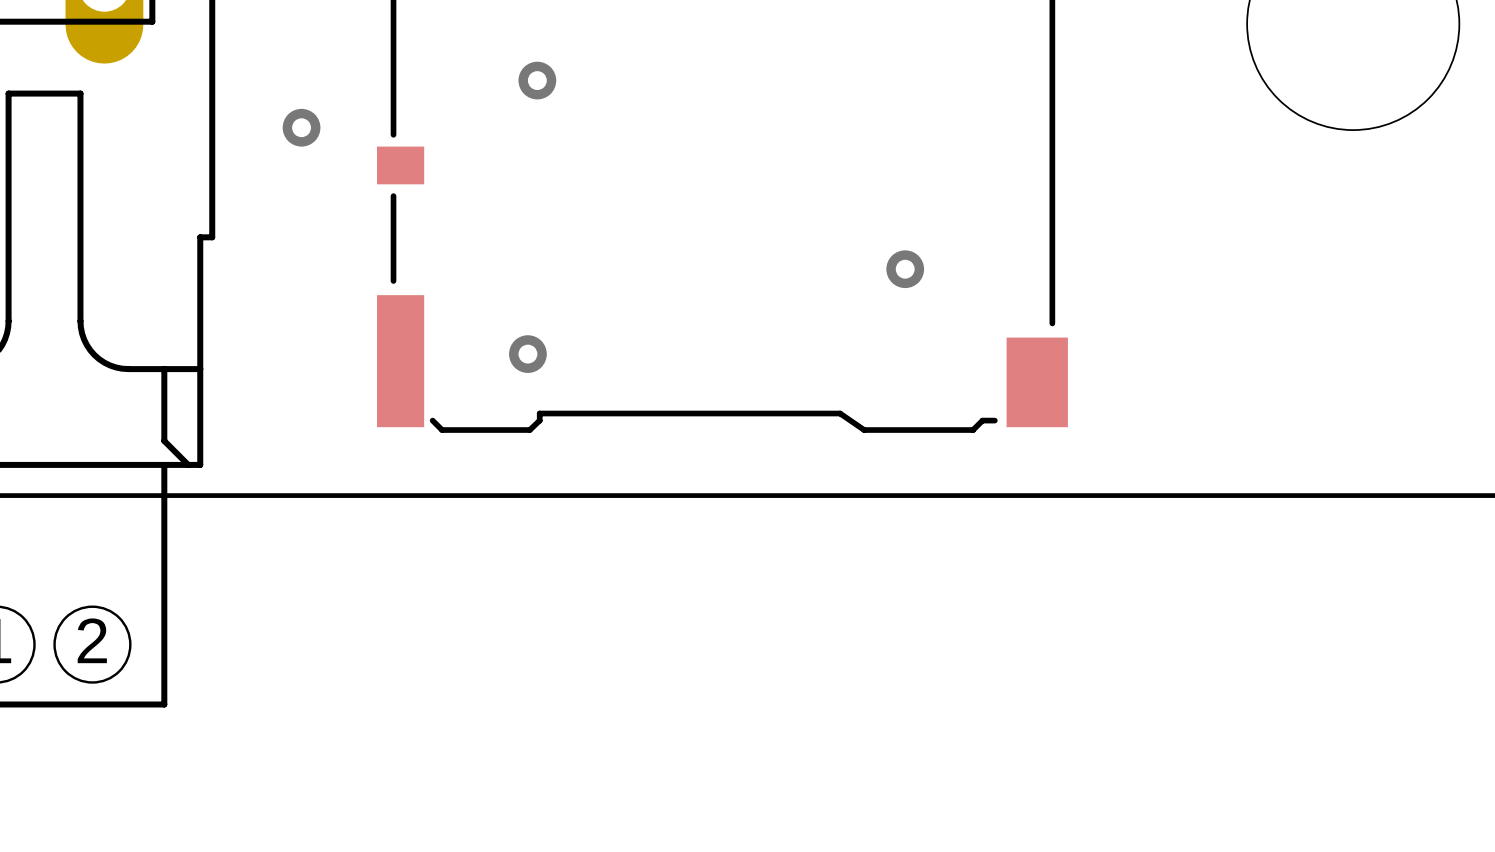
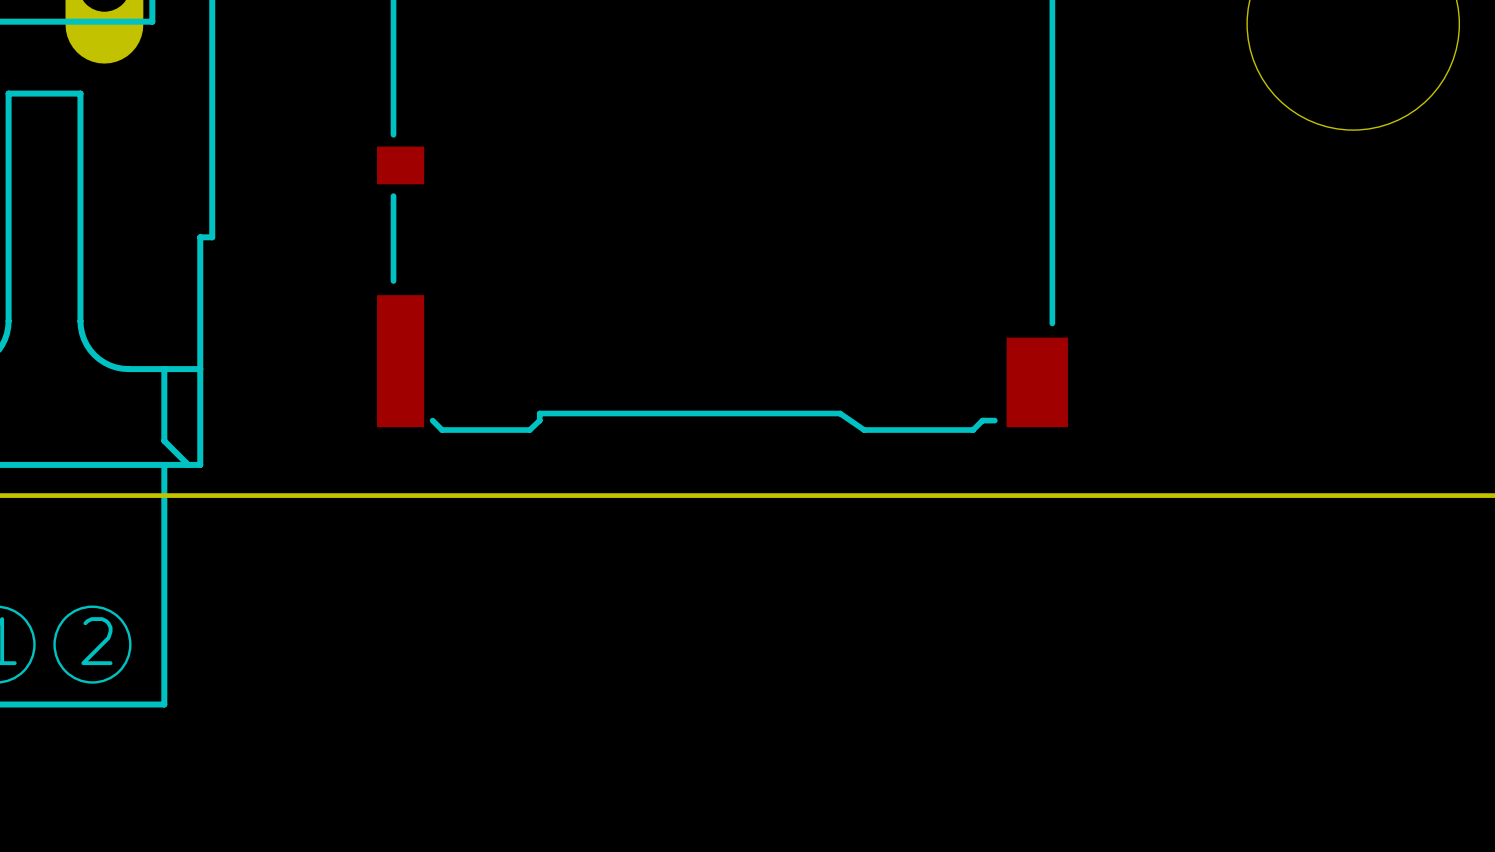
via: (537, 80) -> none
via: (301, 127) -> none
via: (905, 269) -> none
via: (527, 354) -> none

